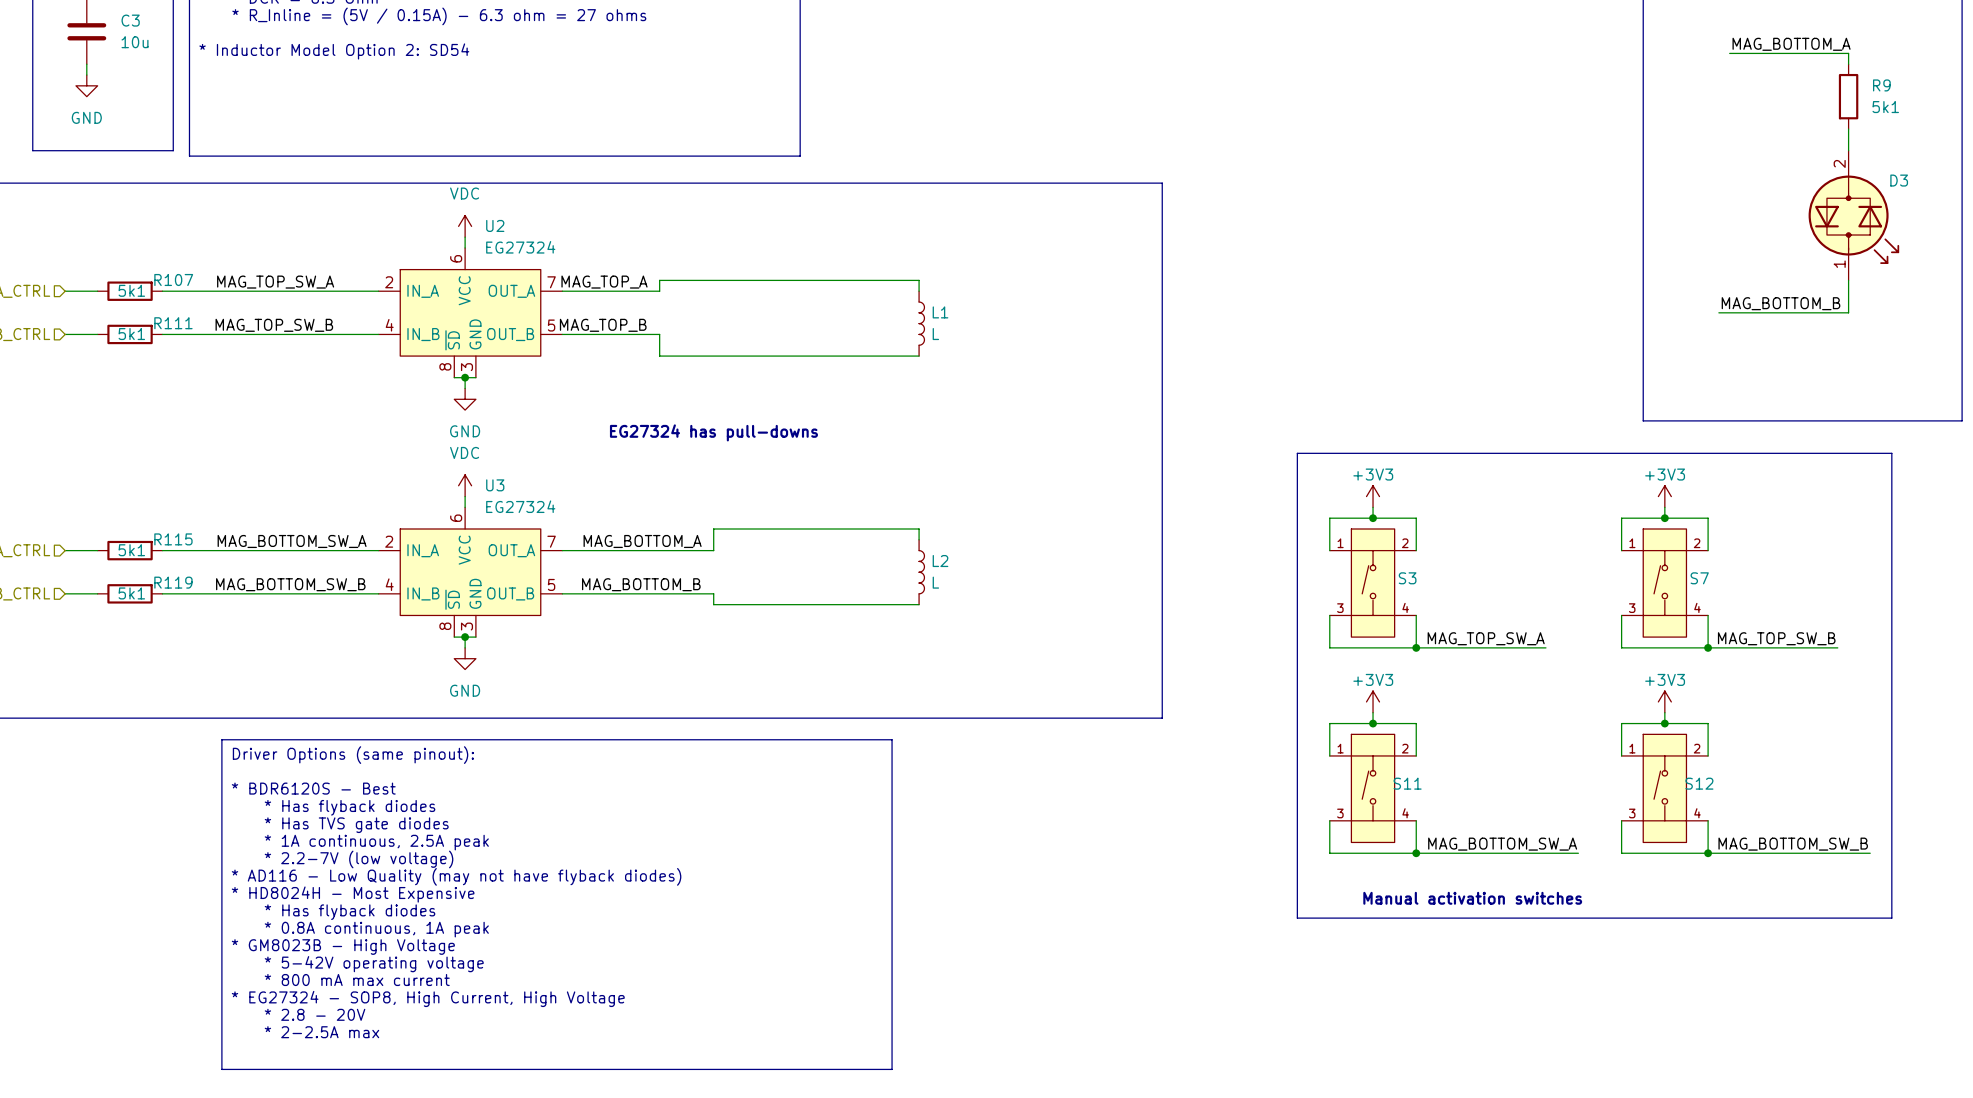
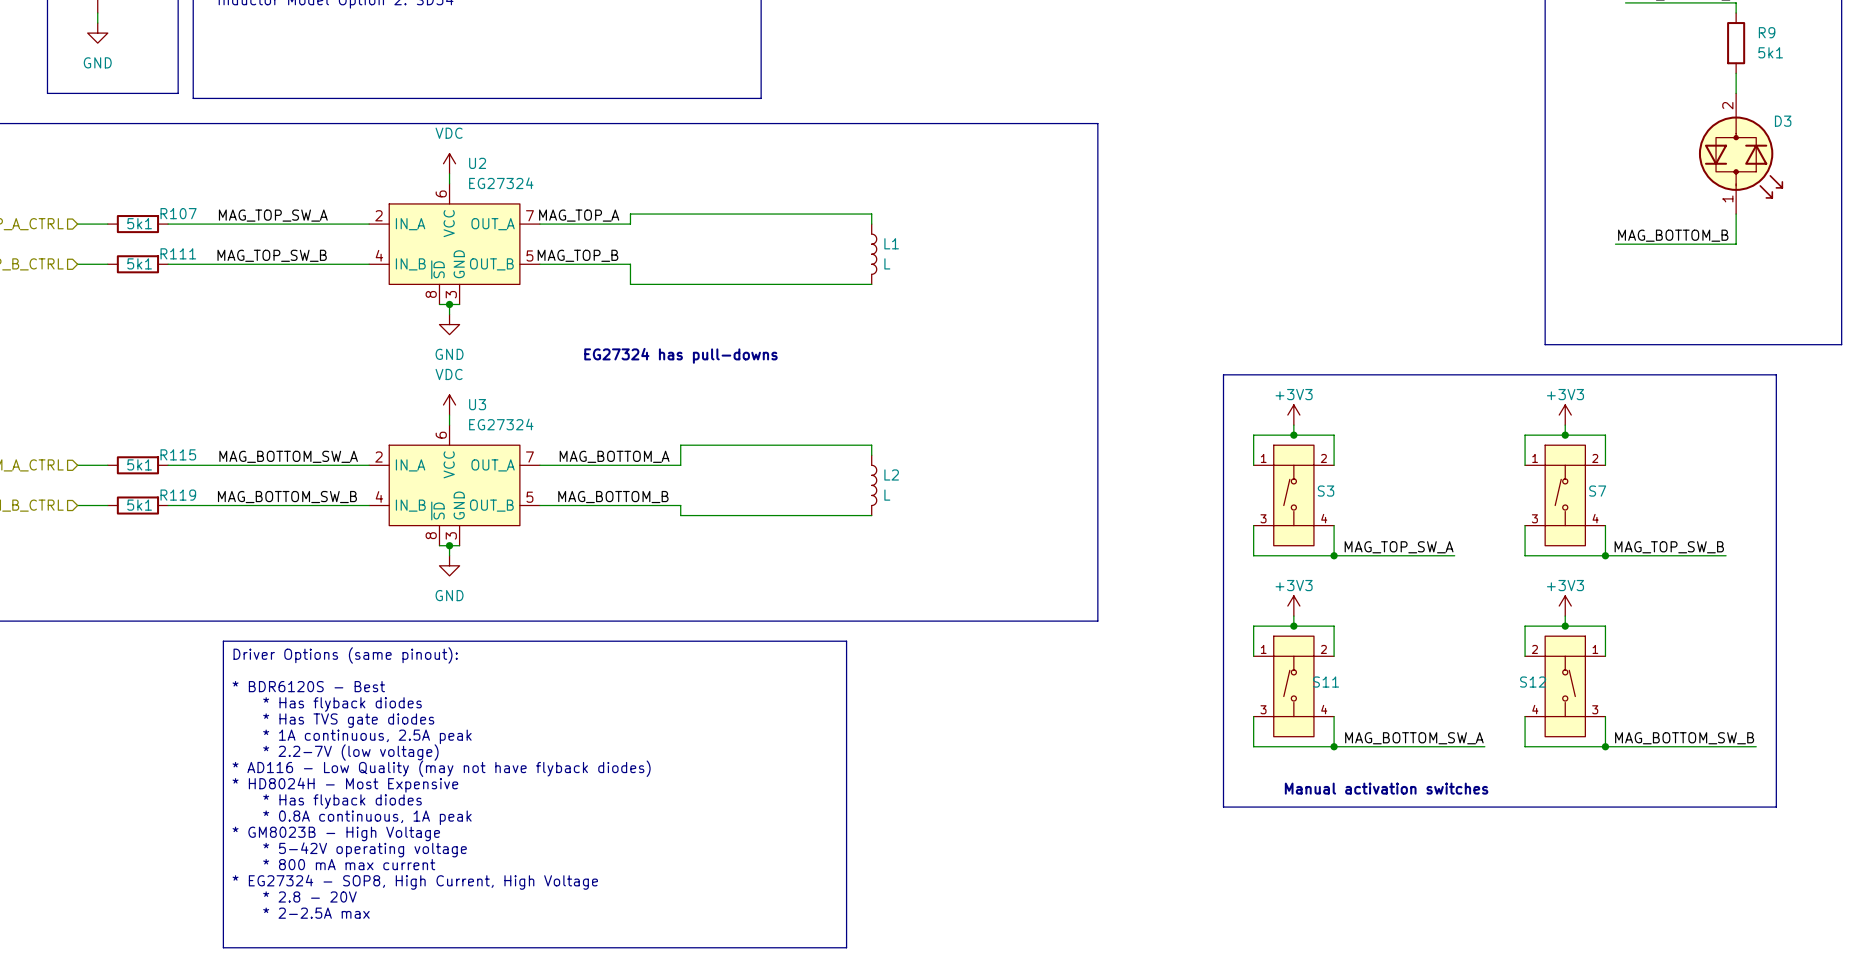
S12 flip: as is (1664, 788) -> left-right (1565, 686)

